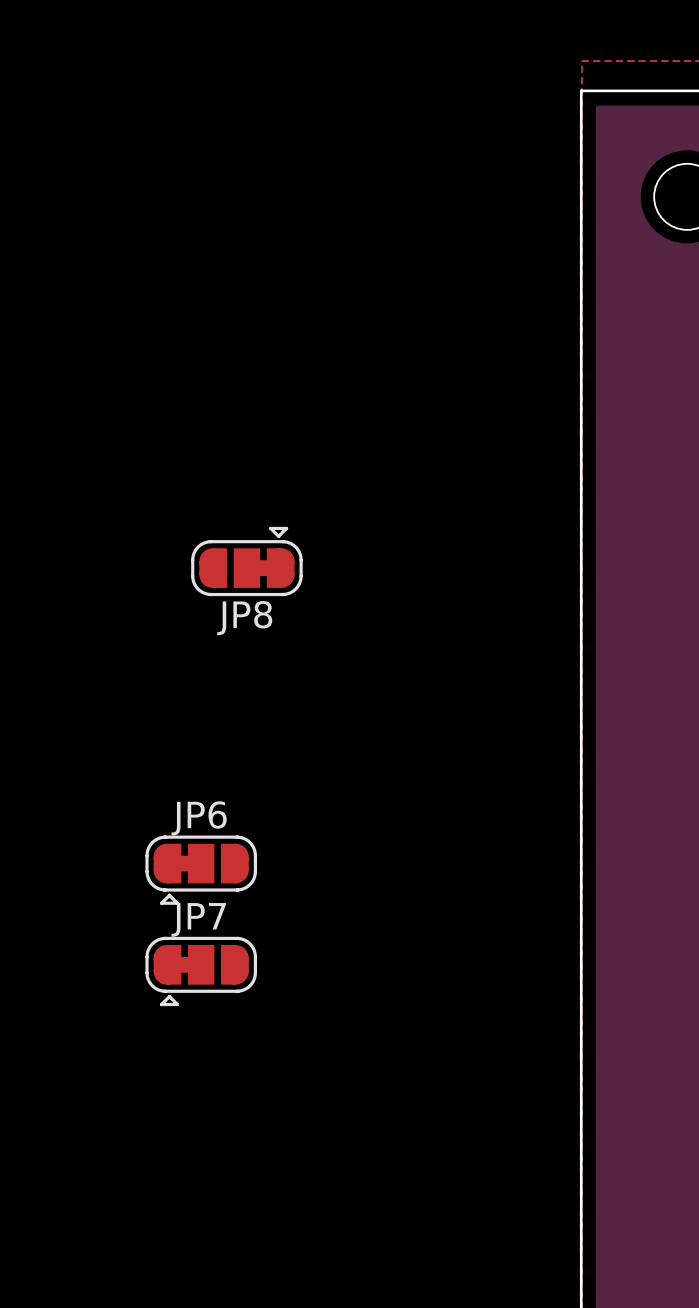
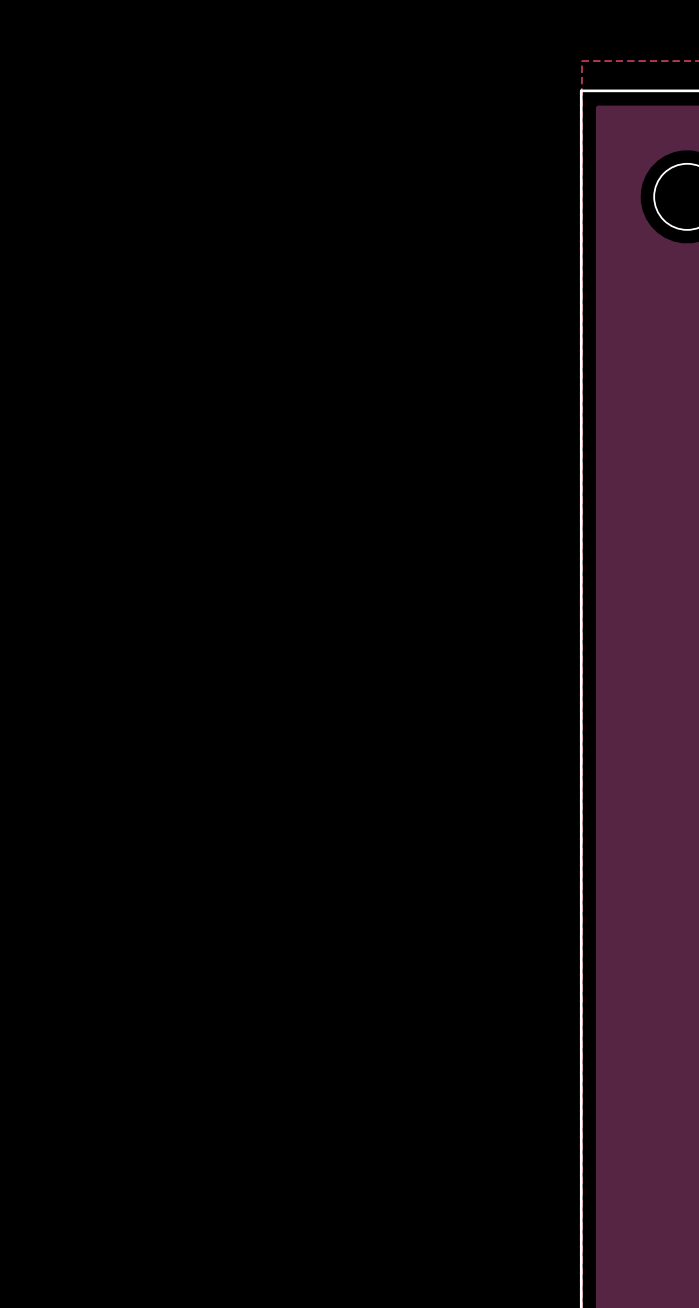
JP8: (246, 561) -> none
JP6: (201, 870) -> none
JP7: (201, 971) -> none

